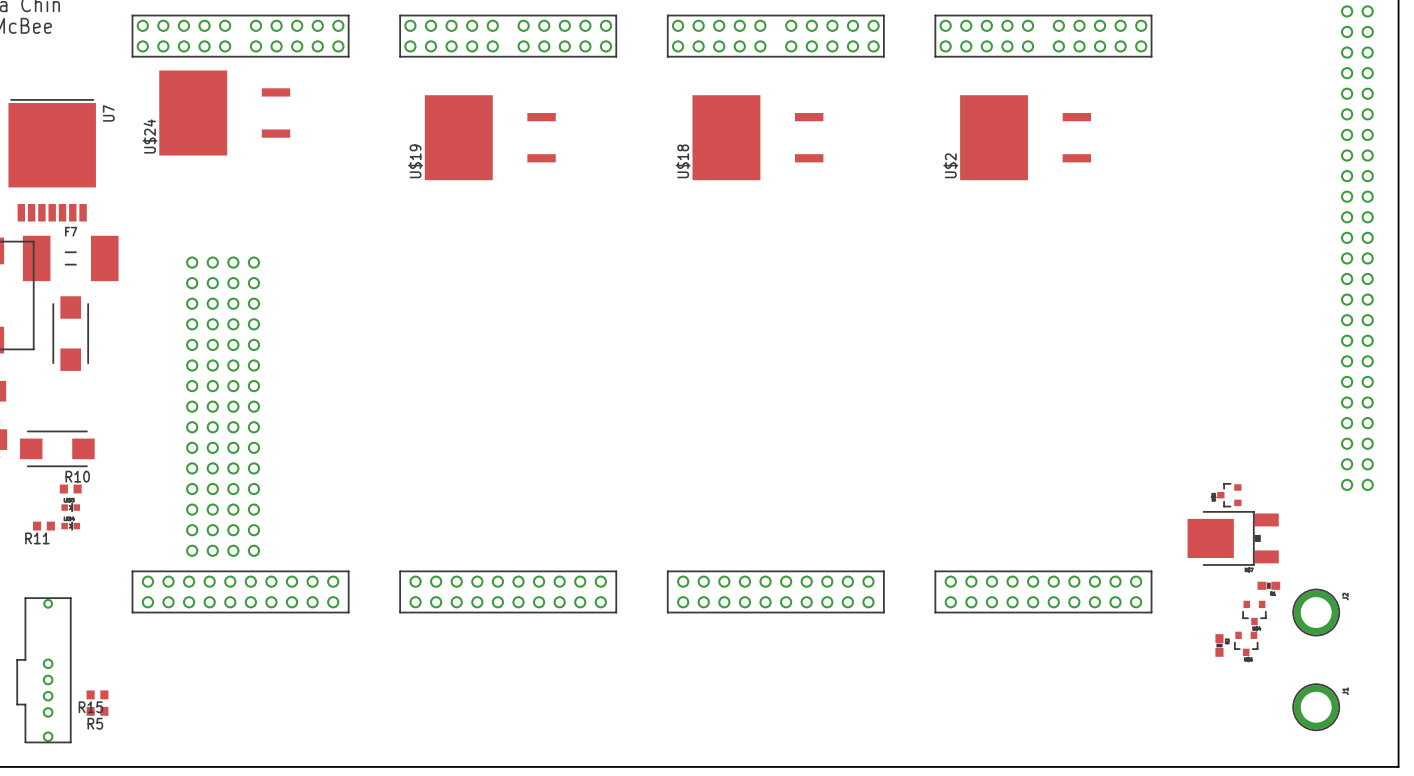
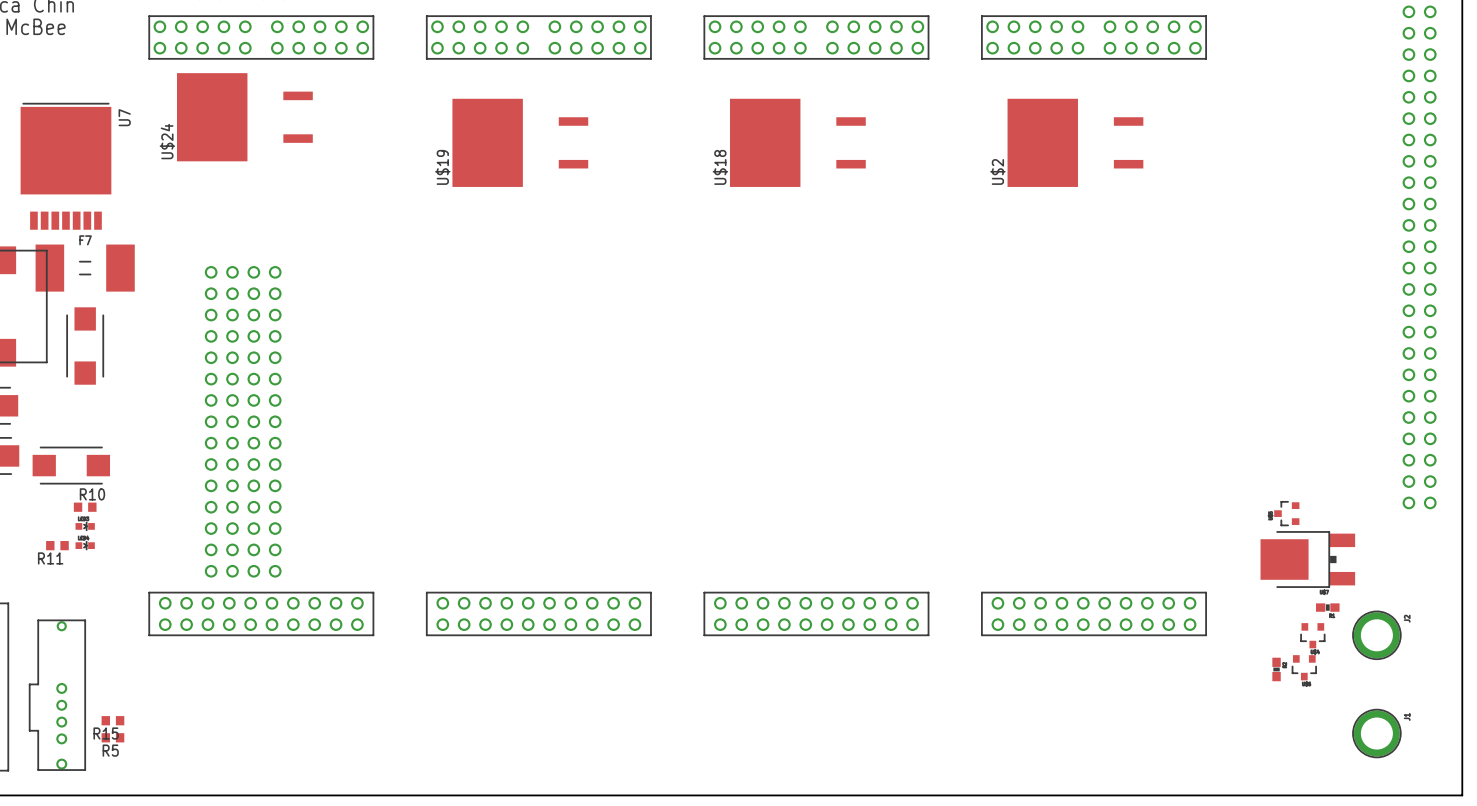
part position: (1233, 538) -> (1307, 559)

